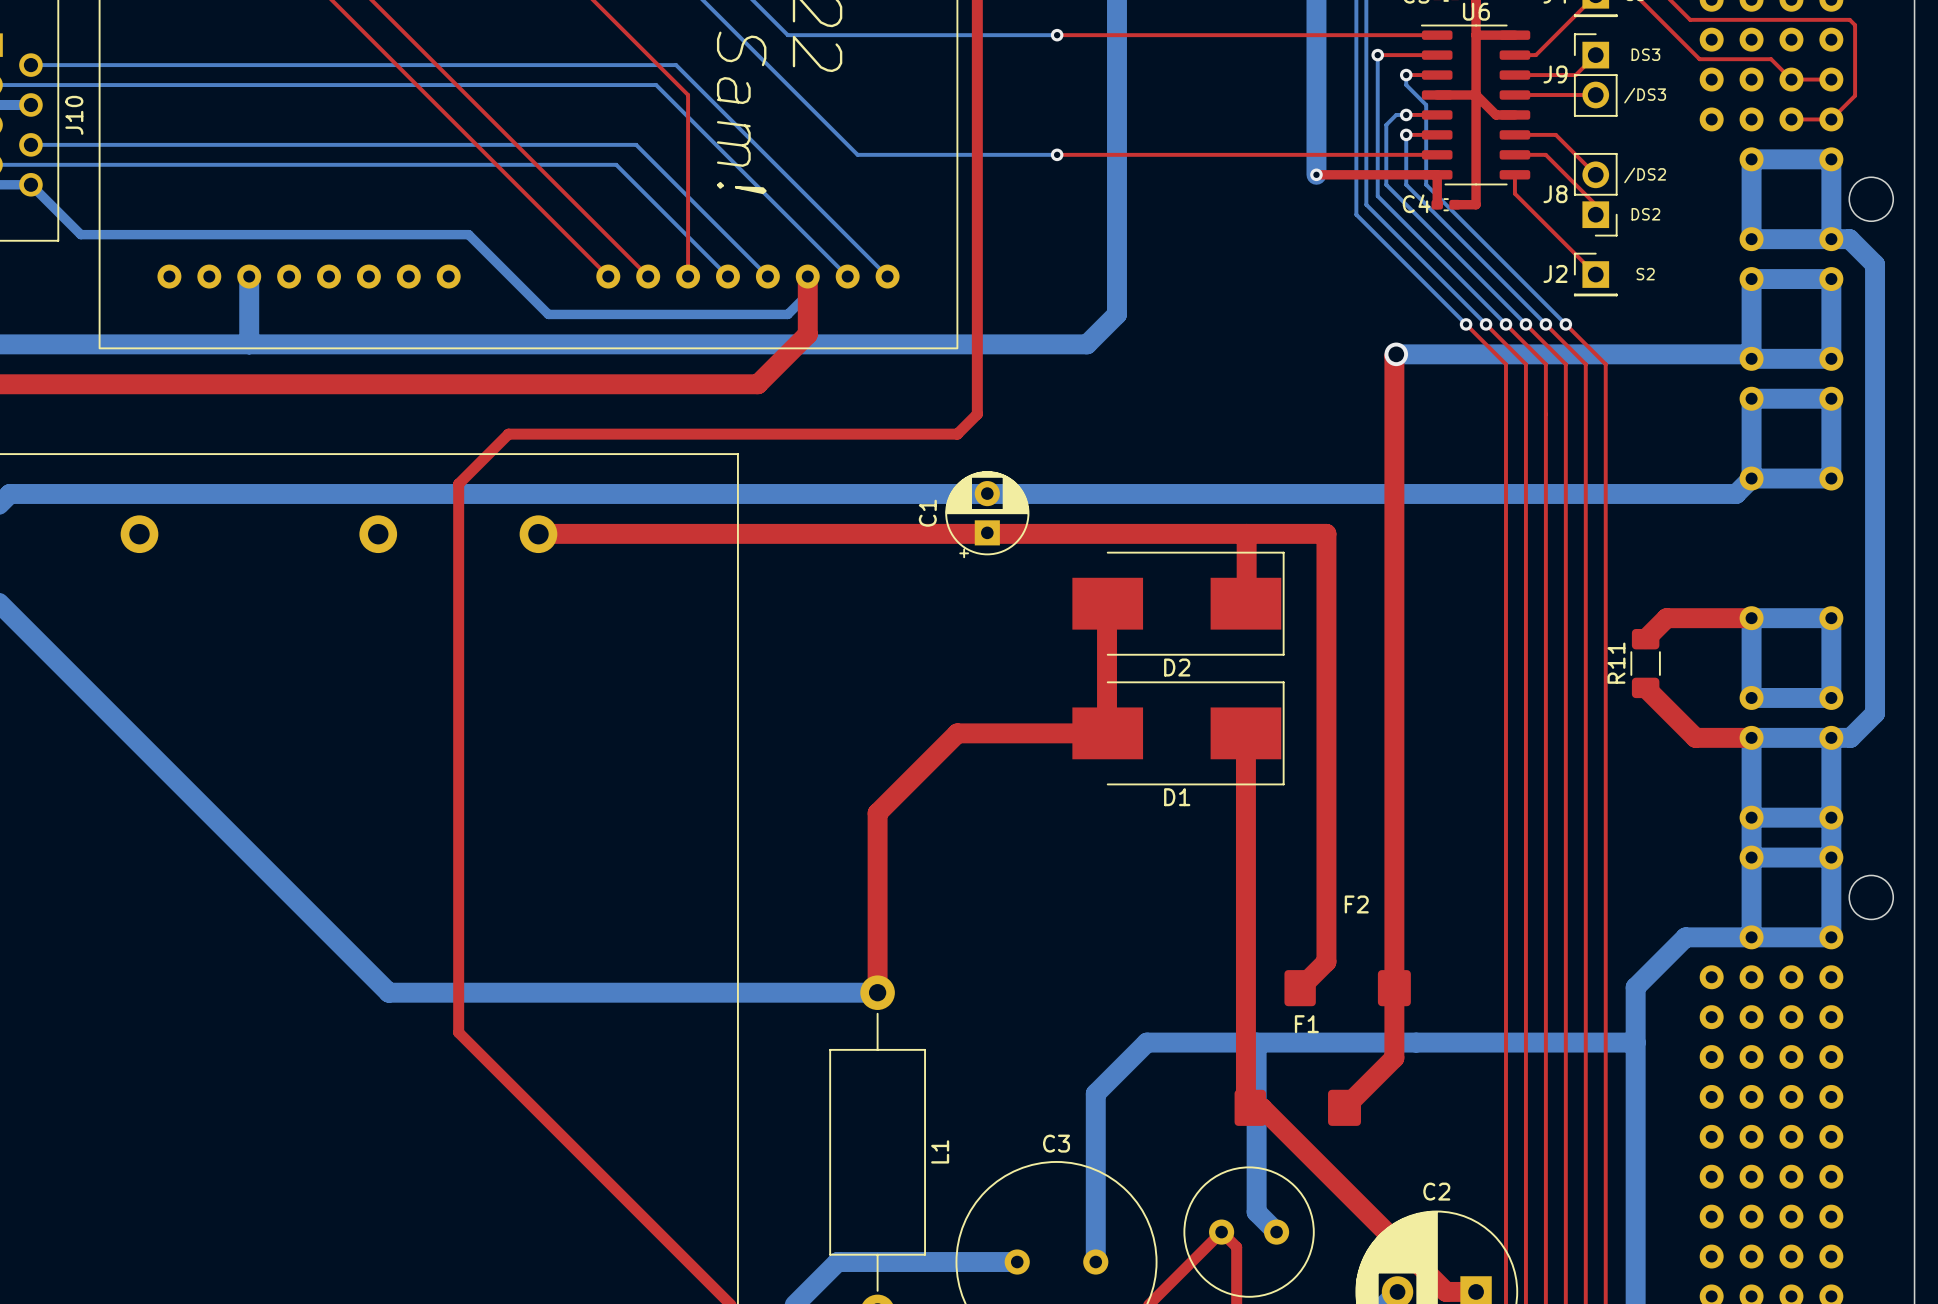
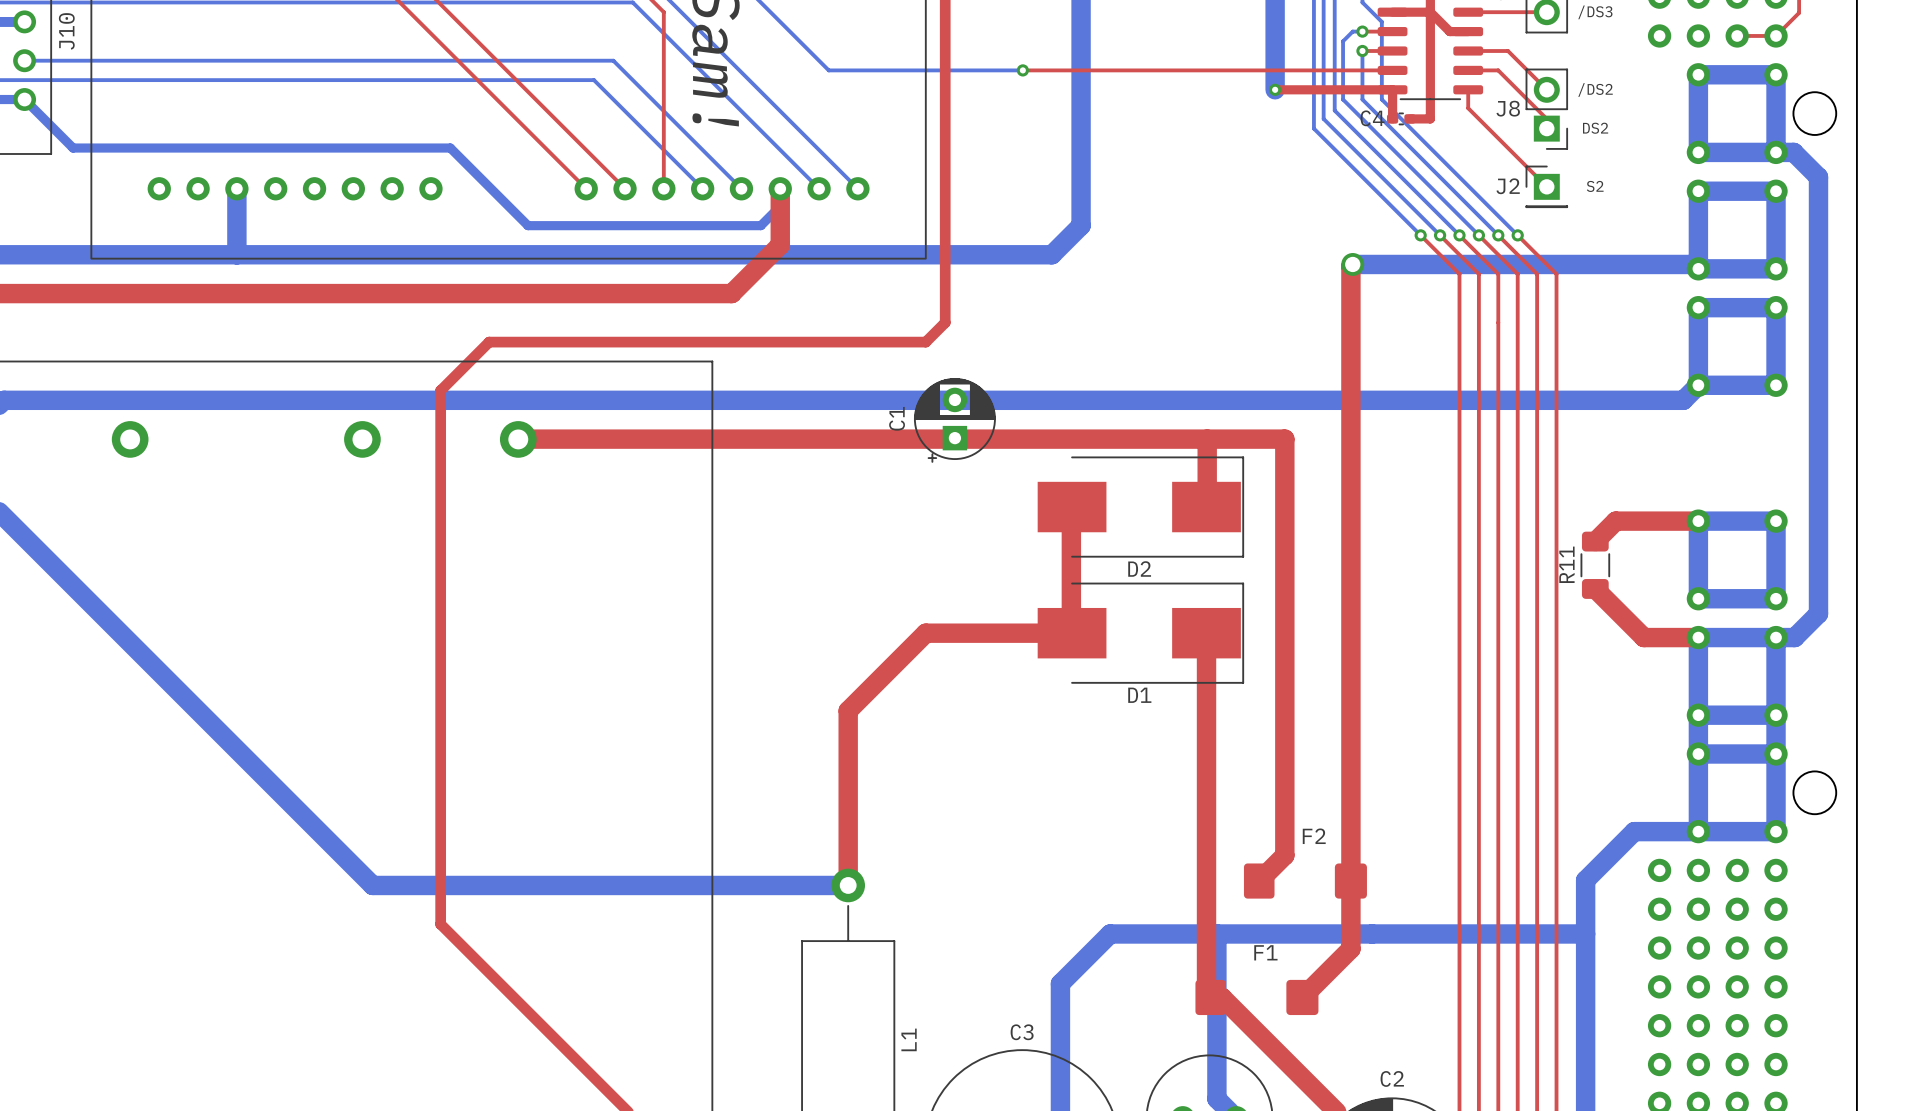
F2 name position: F2 (1356, 904) -> F2 (1314, 836)
F1 name position: F1 (1306, 1024) -> F1 (1265, 952)

